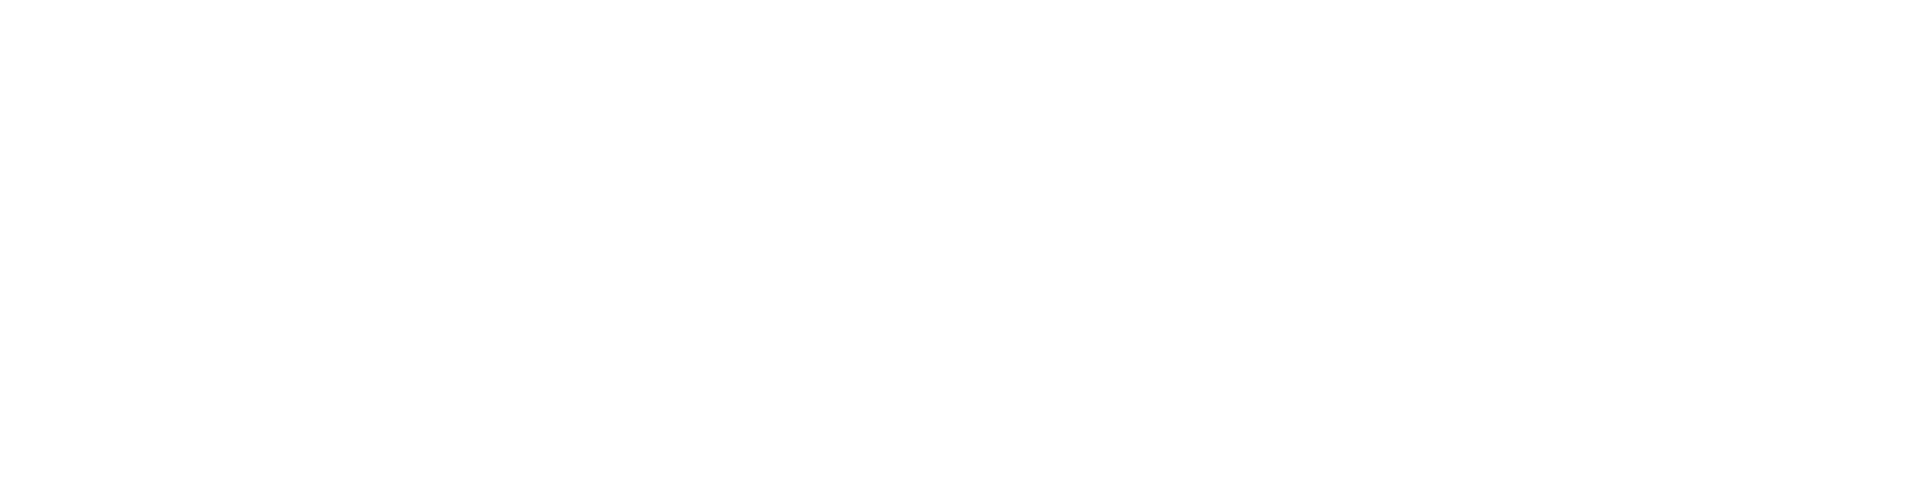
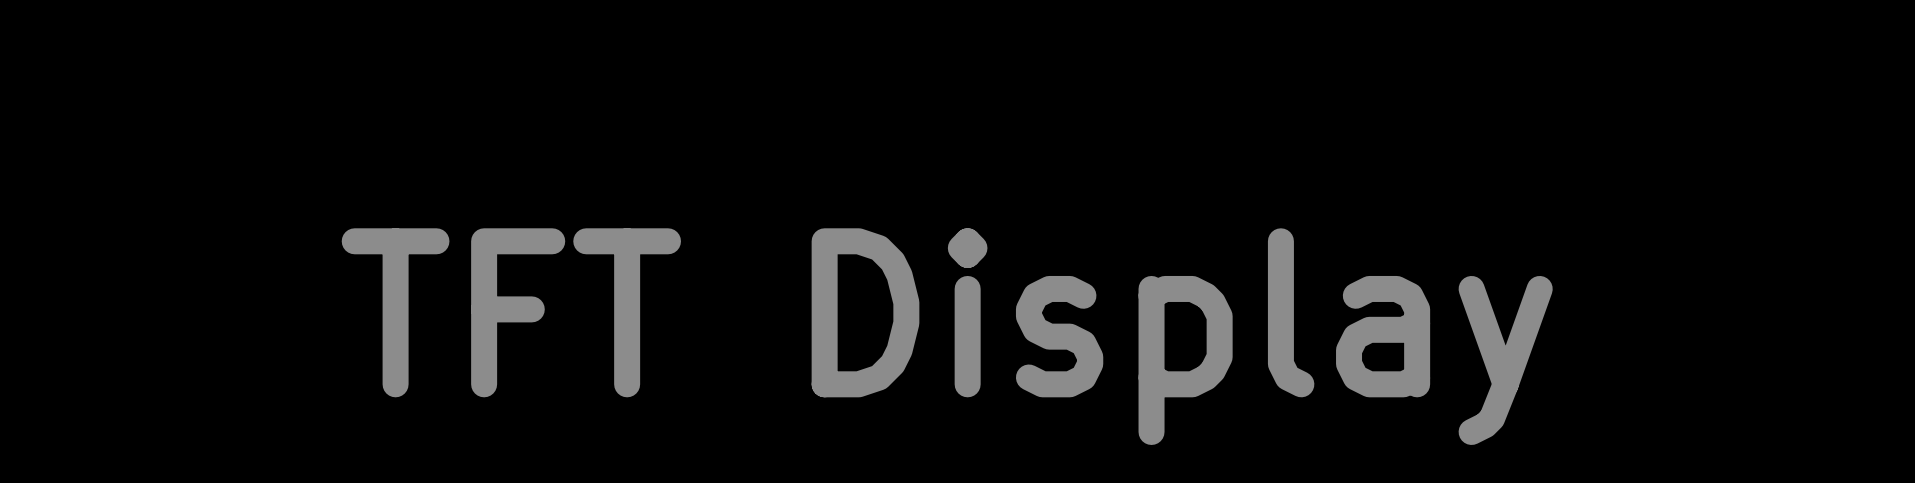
text: none -> TFT Display (947, 336)

